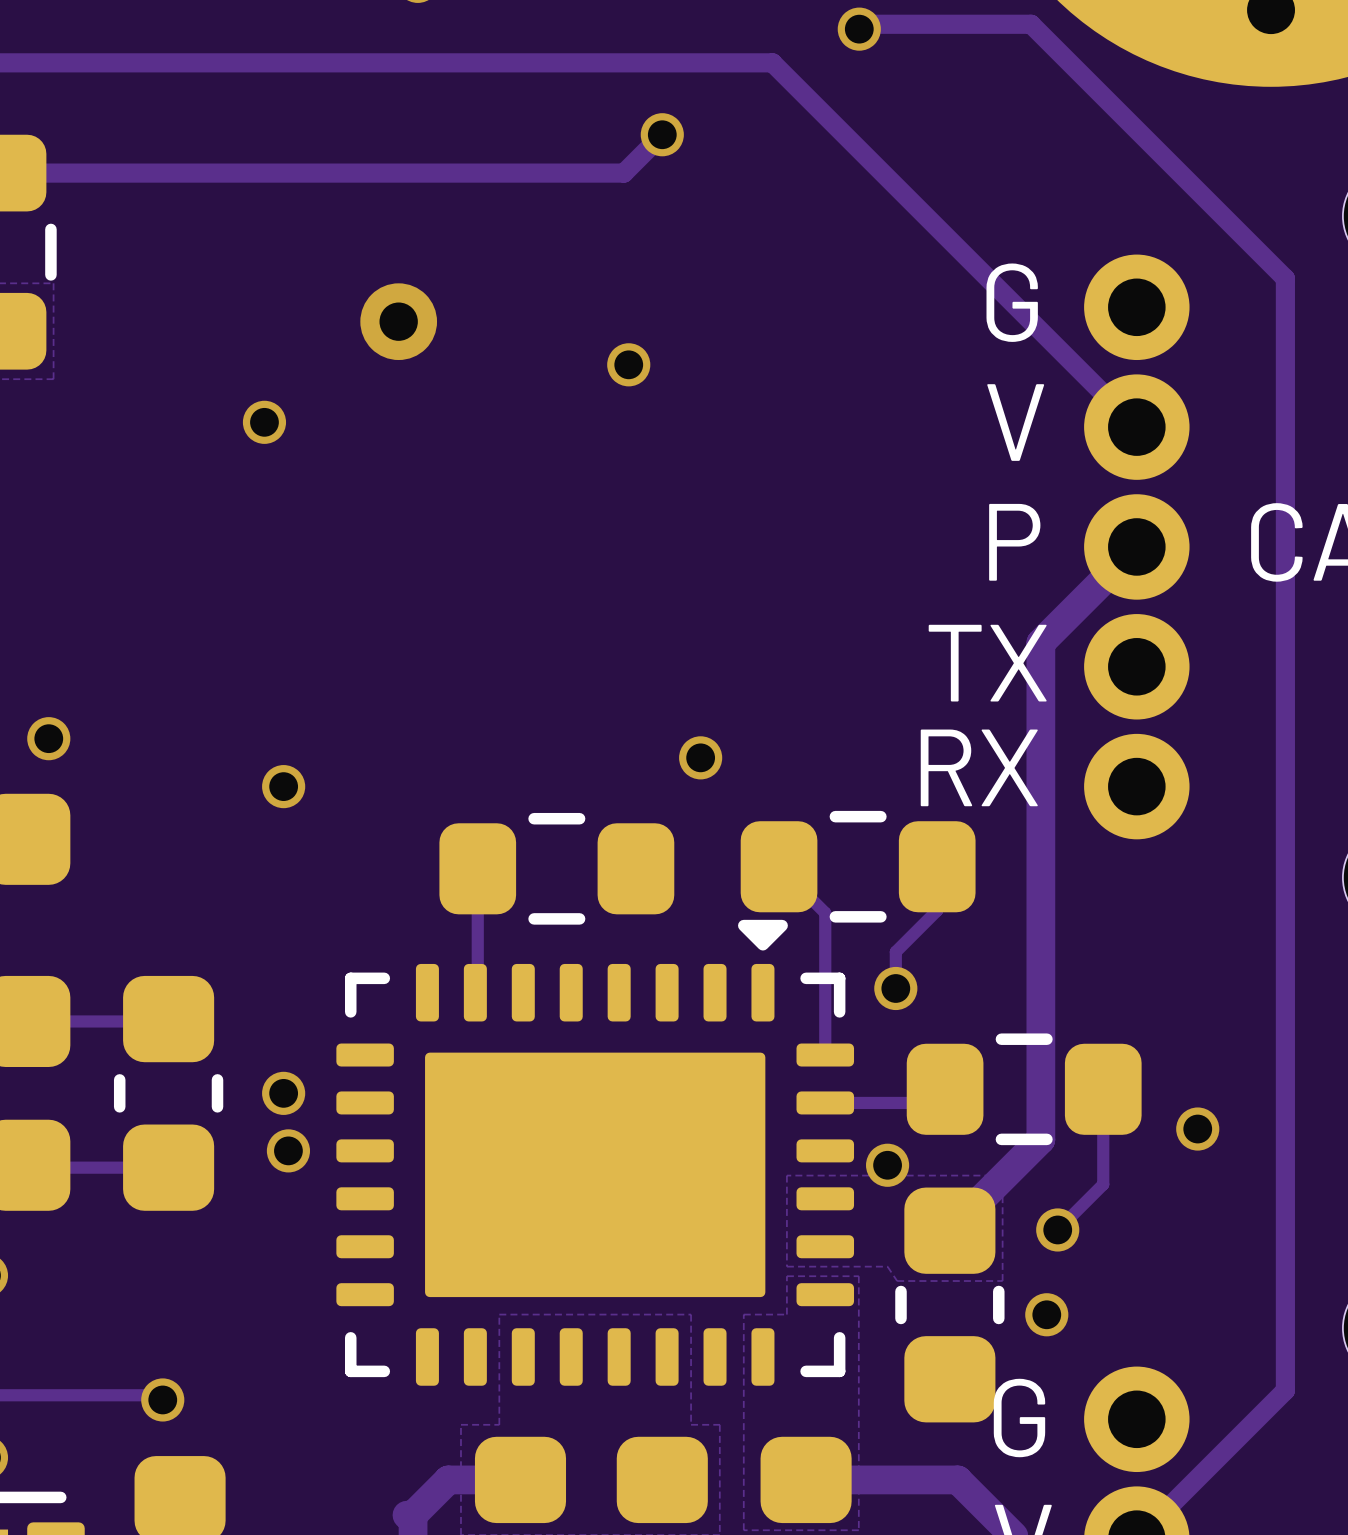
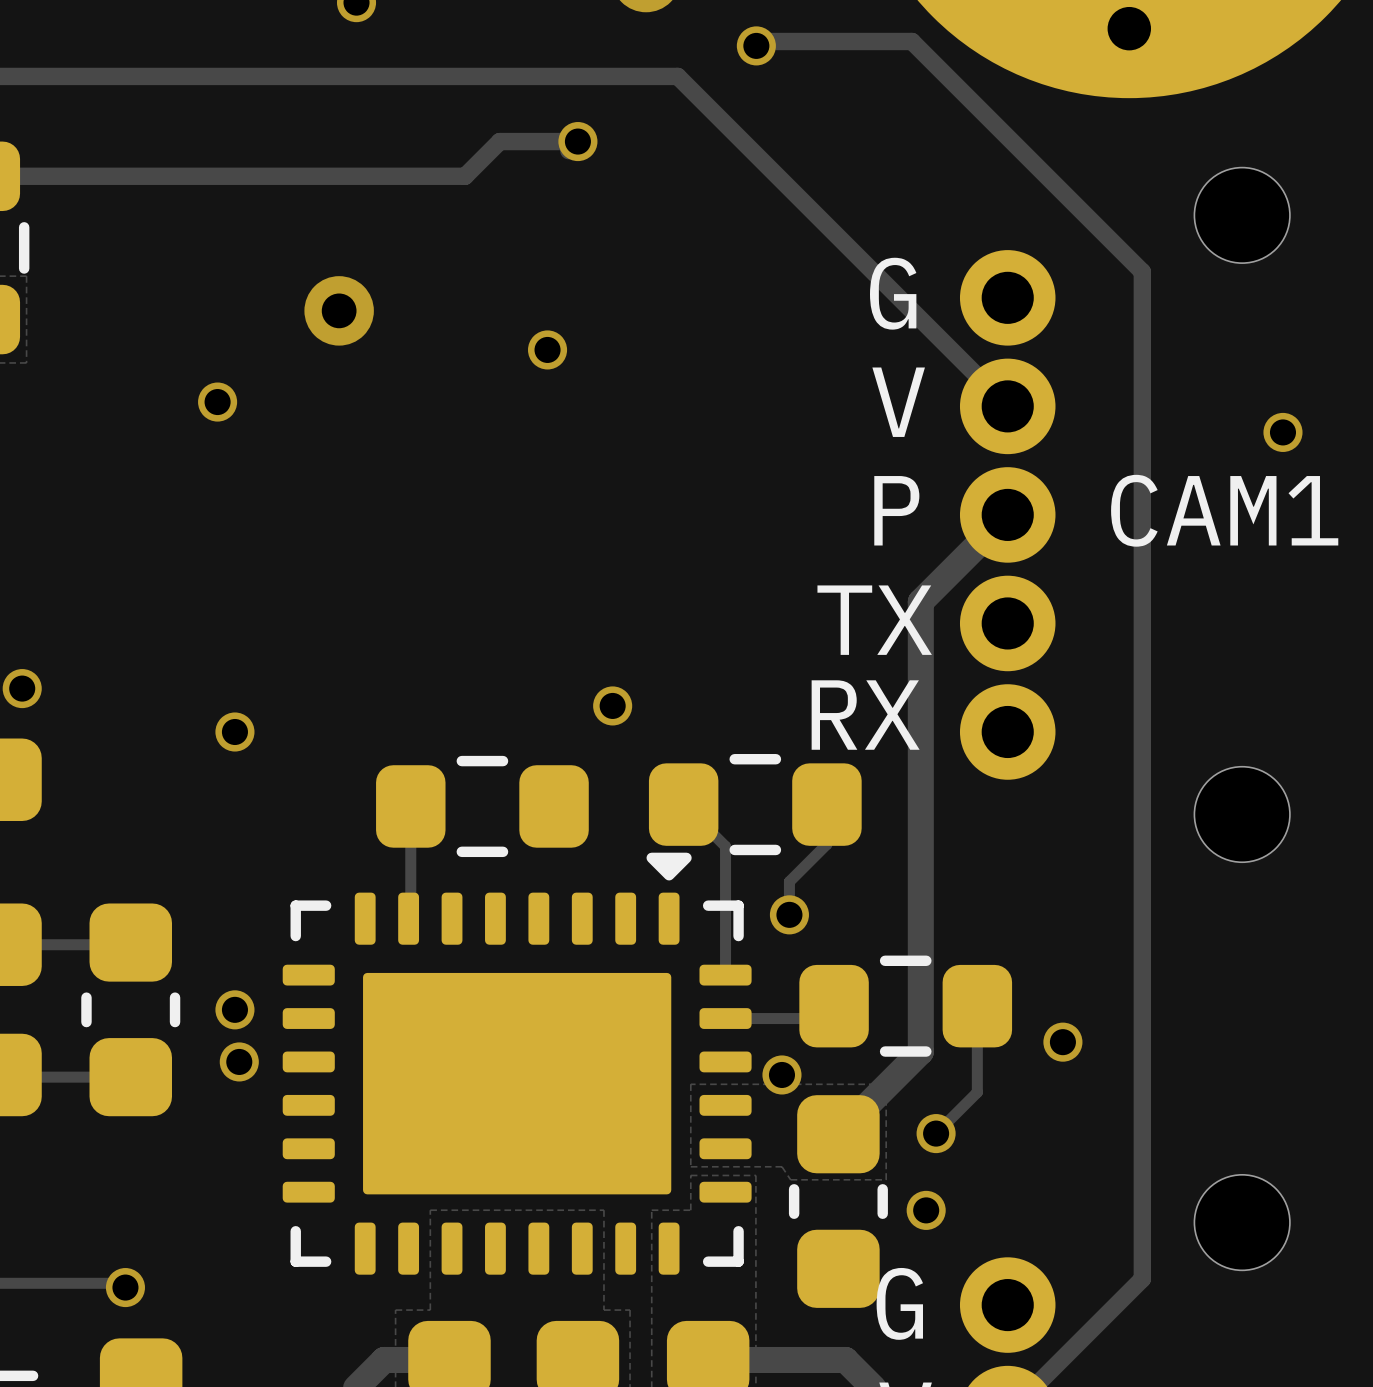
track: (652, 144) (623, 173) (537, 173) -> (577, 141) (499, 141) (465, 176)

